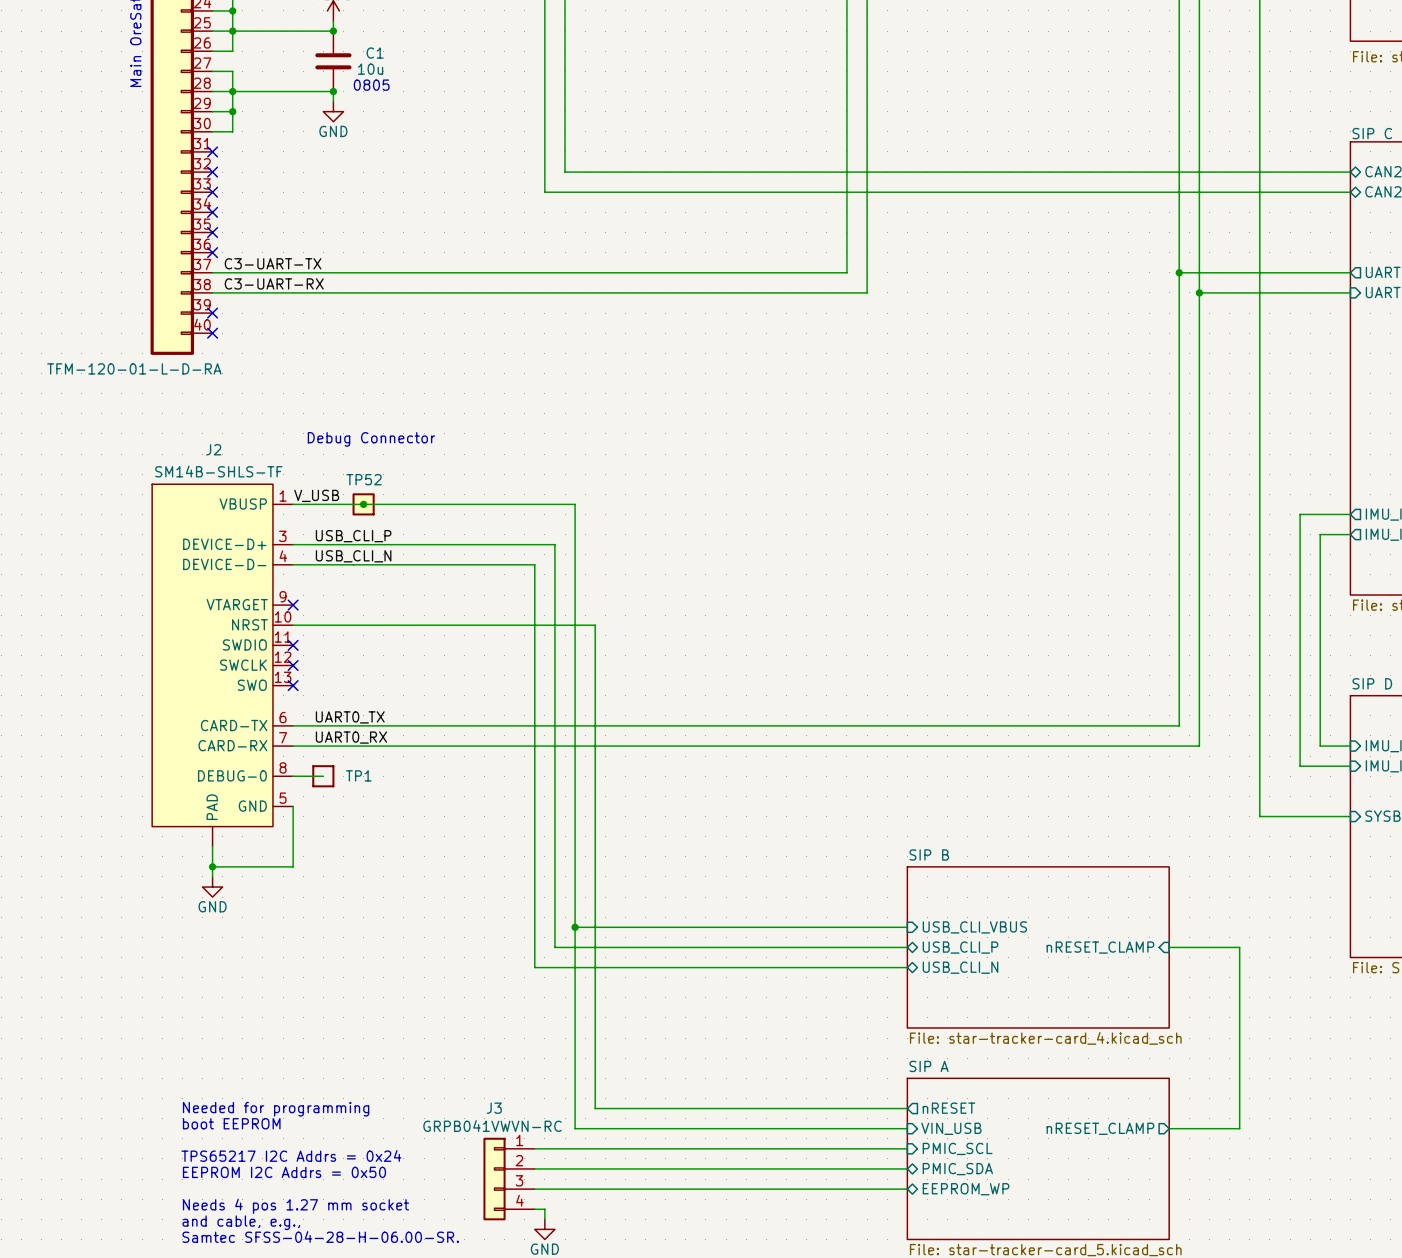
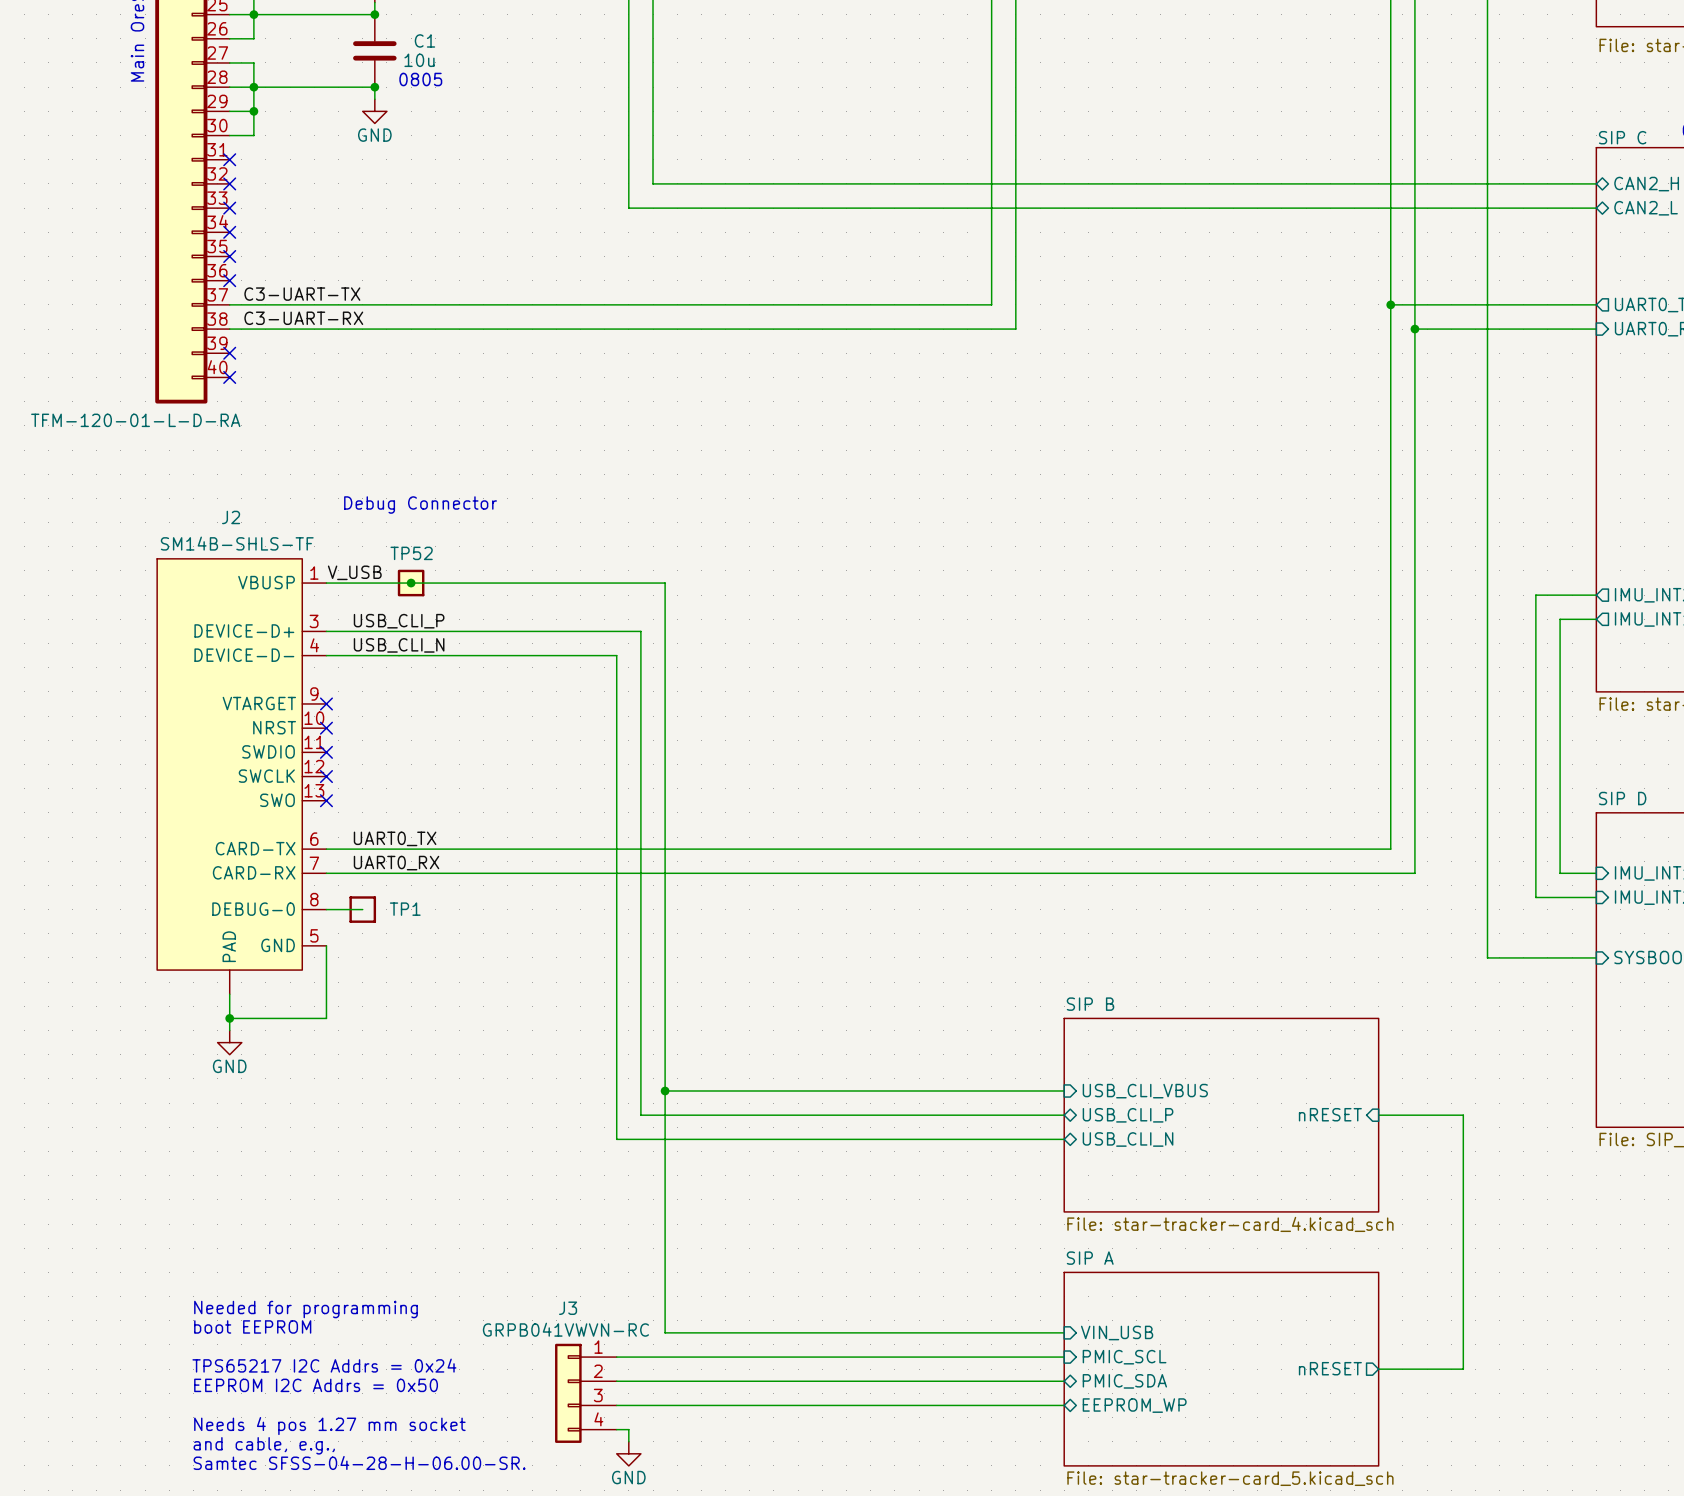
wire: (293, 625) (595, 625) (595, 1108) (907, 1108) -> none
no-connect mark: none -> (326, 728)
sheet pin: nRESET_CLAMP (1100, 947) -> nRESET (1330, 1114)
sheet pin: nRESET (948, 1108) -> none
sheet pin: nRESET_CLAMP (1100, 1128) -> none
wire: (1169, 1128) (1239, 1128) -> (1378, 1369) (1463, 1369) (1463, 1332)
sheet pin: none -> nRESET (1330, 1368)

